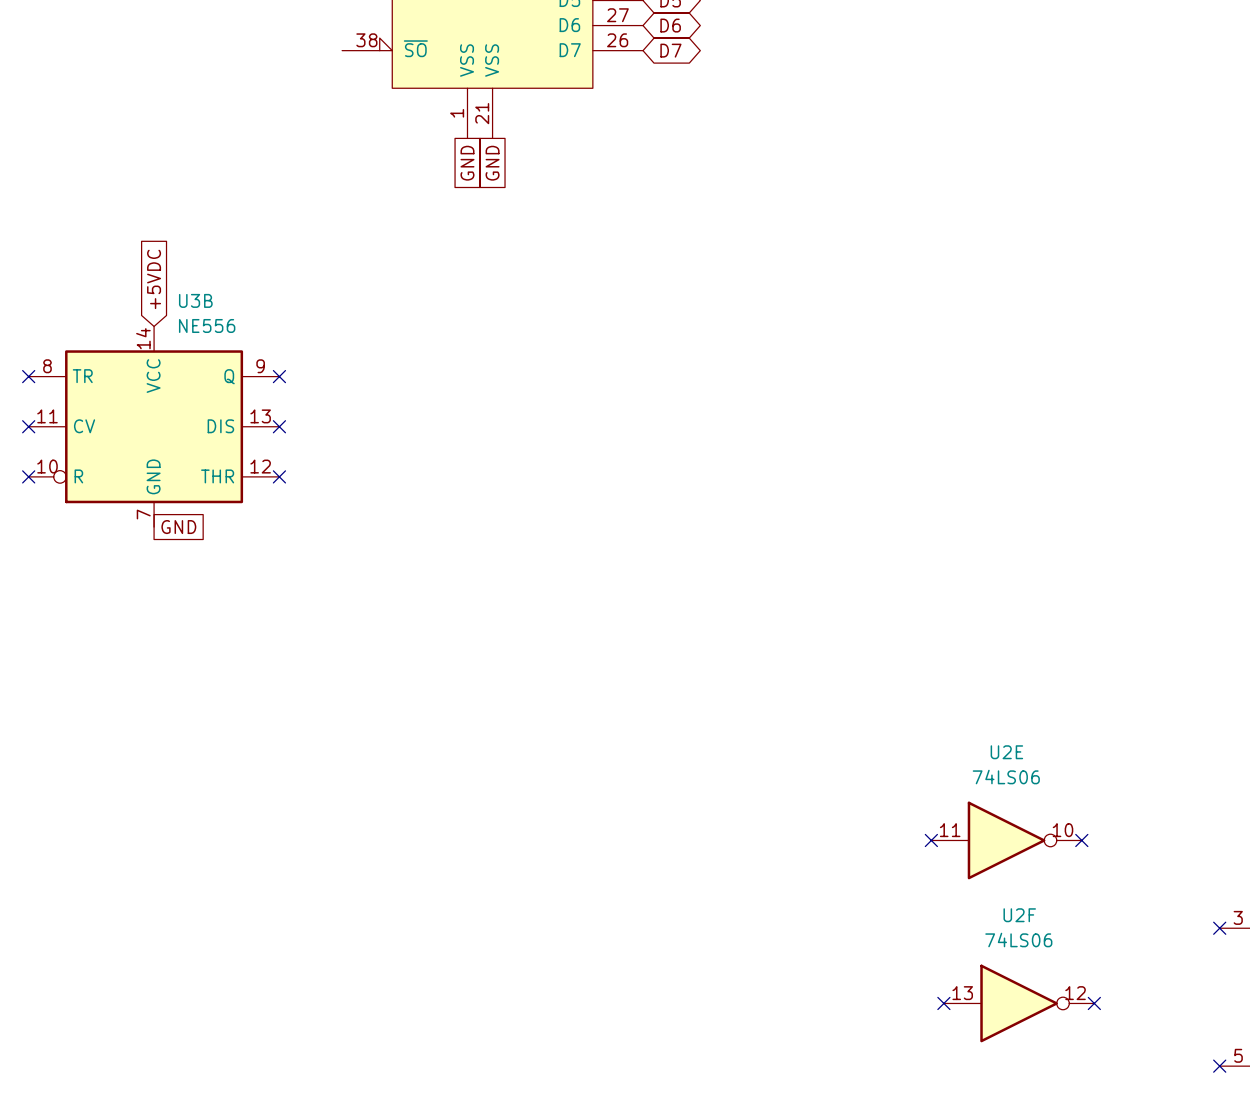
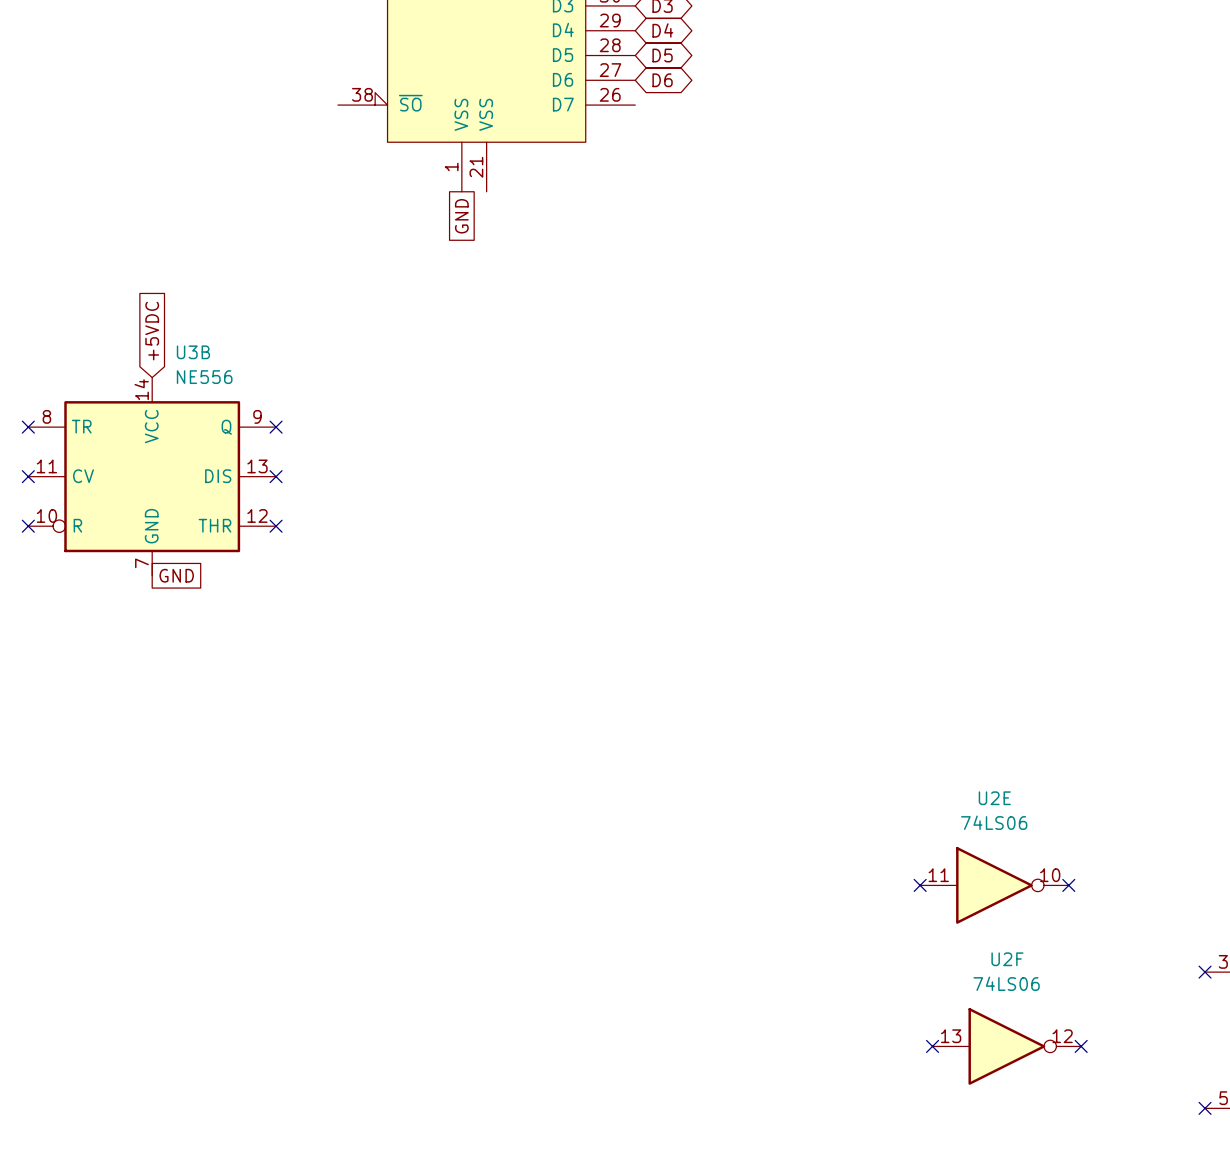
global label: D7 (670, 50) -> none
global label: GND (492, 163) -> none

